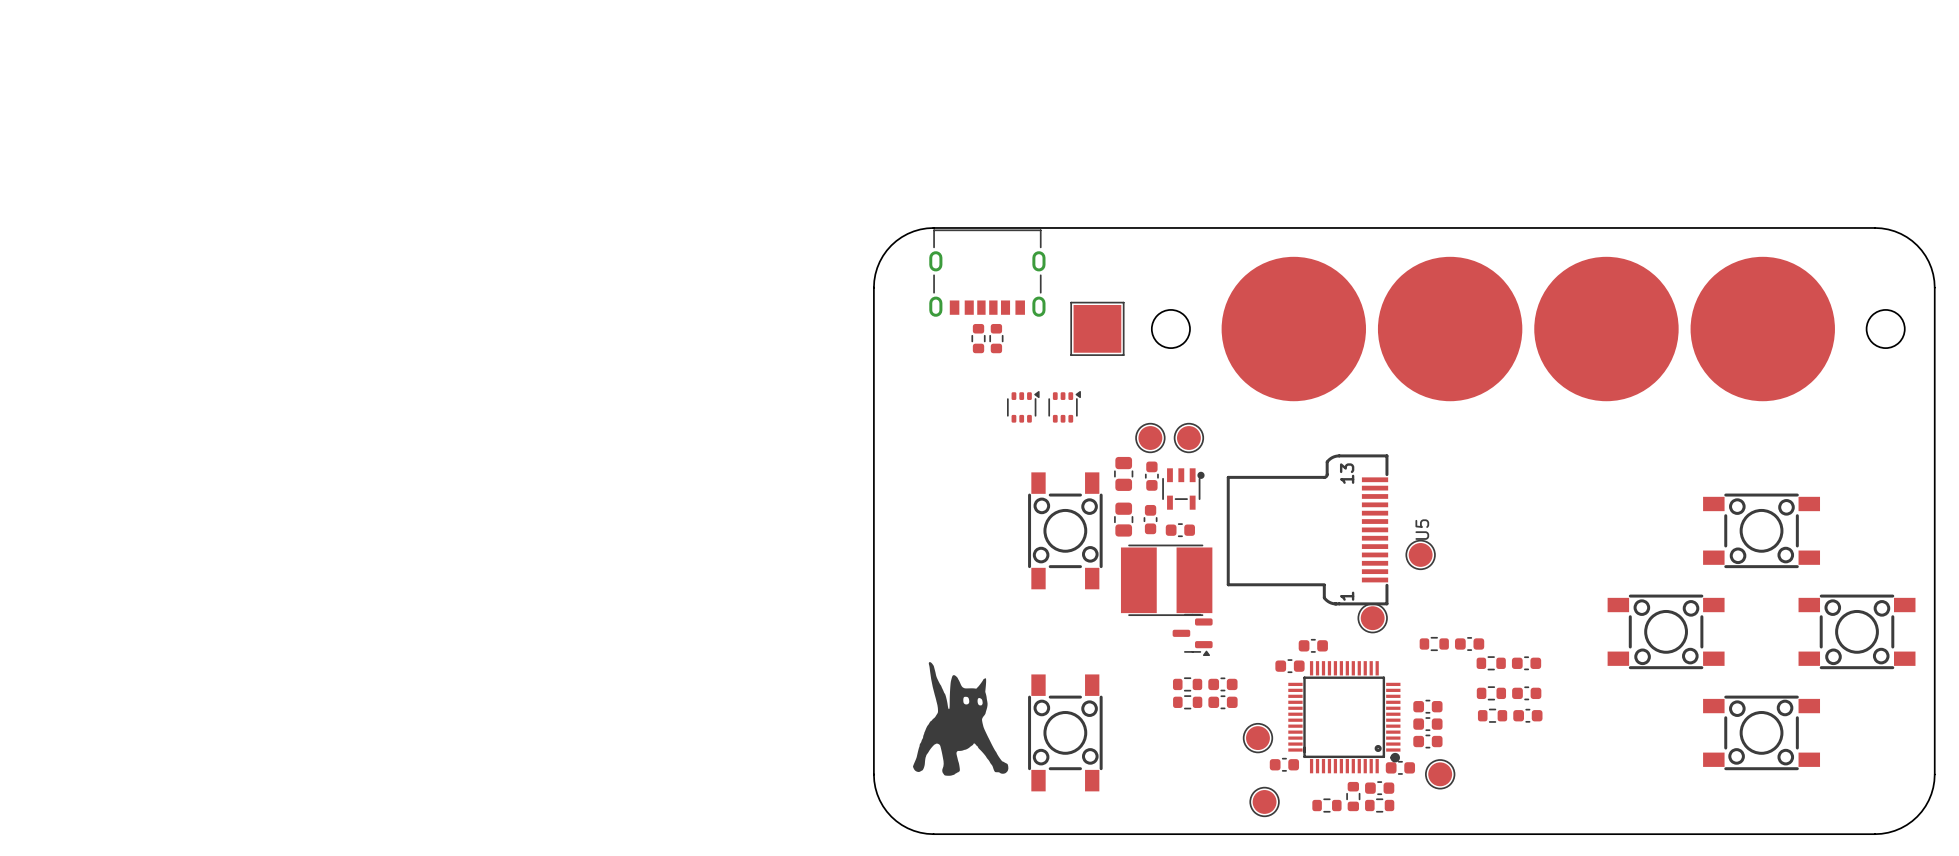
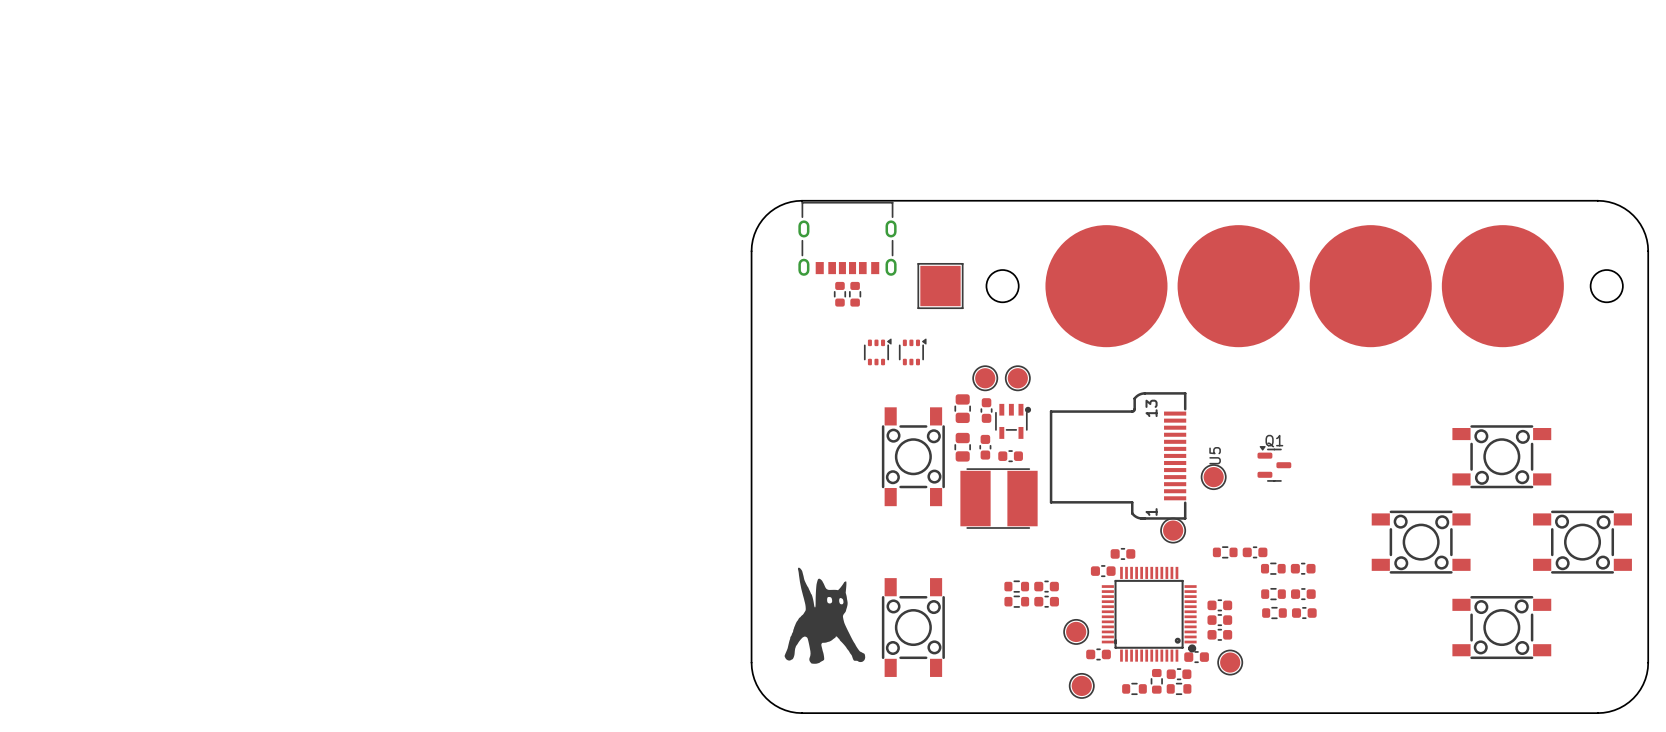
Q1: none -> (1274, 463)
part: (1192, 634) -> none

